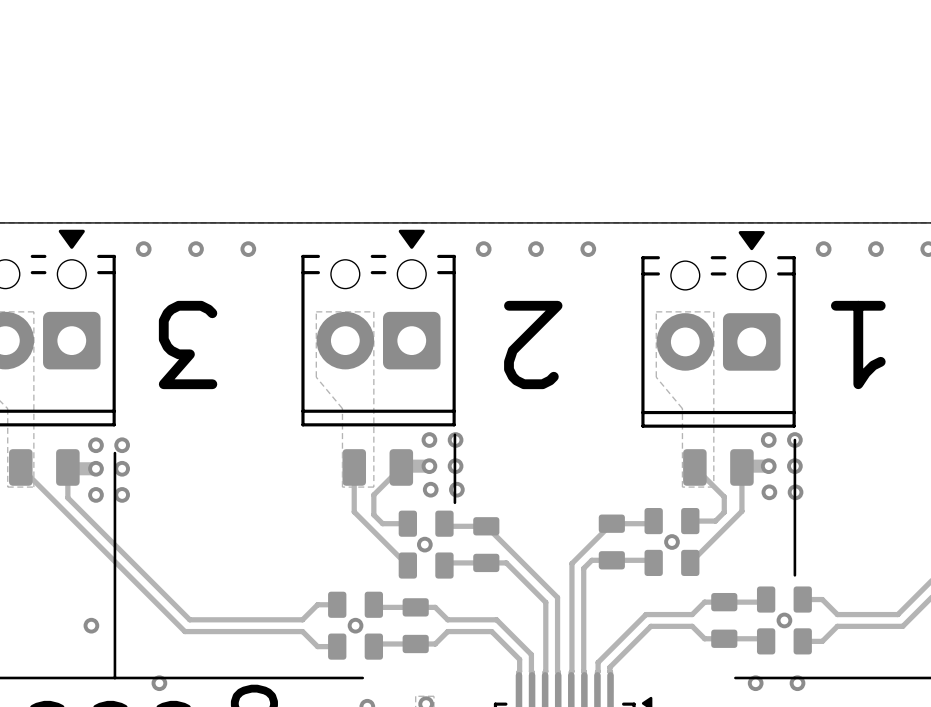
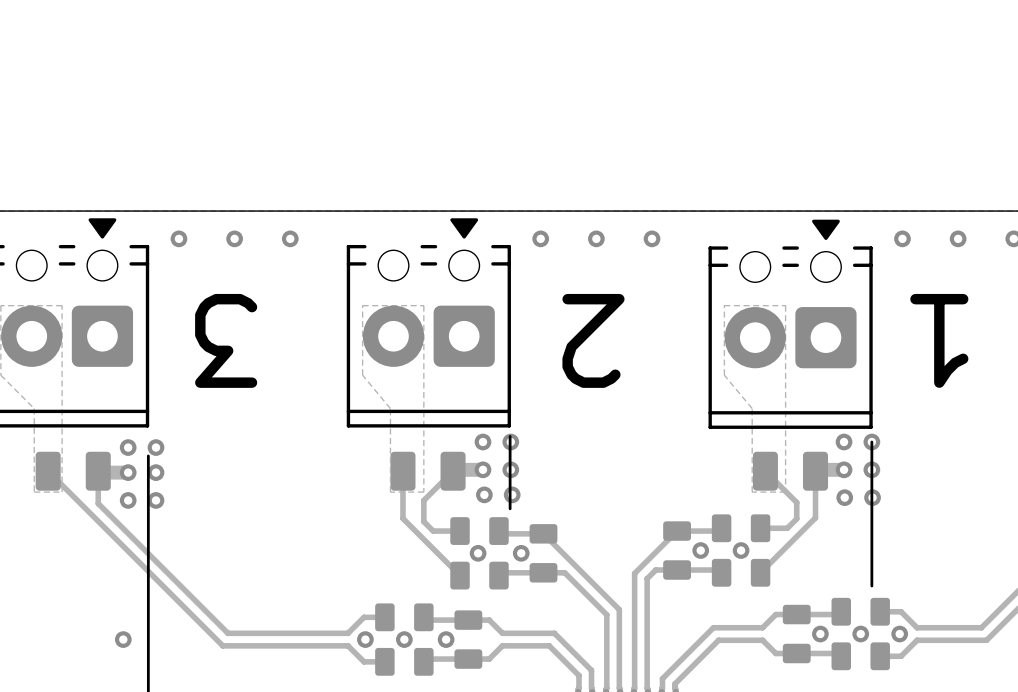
via: none -> (700, 550)
via: none -> (521, 553)
via: none -> (820, 634)
via: none -> (899, 634)
via: none -> (365, 639)
via: none -> (446, 639)

